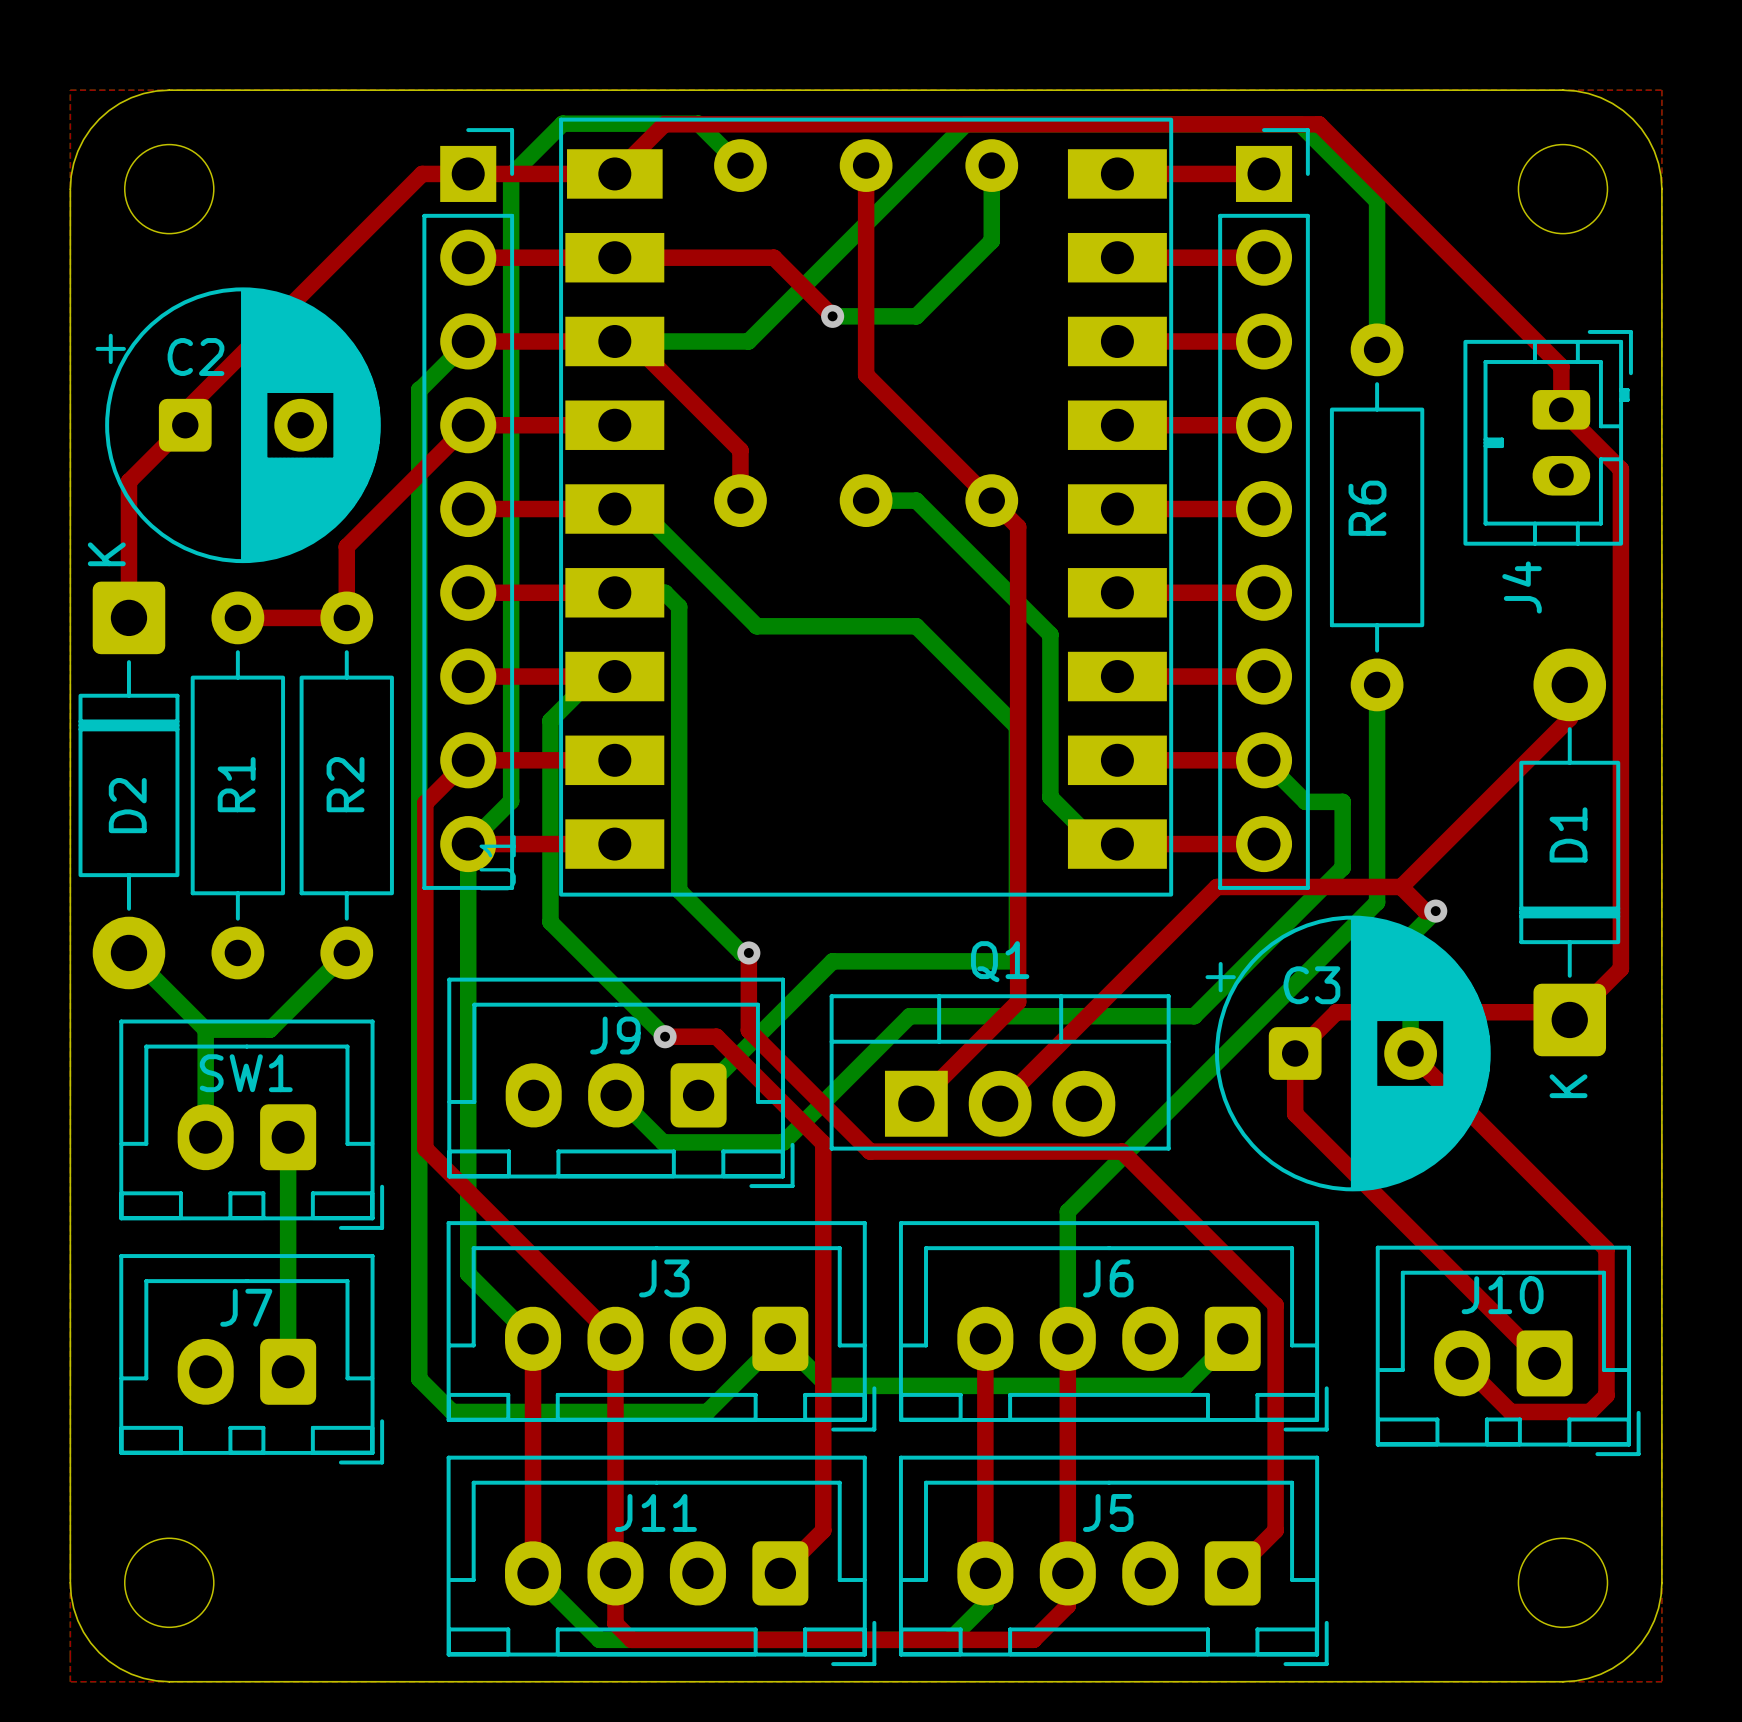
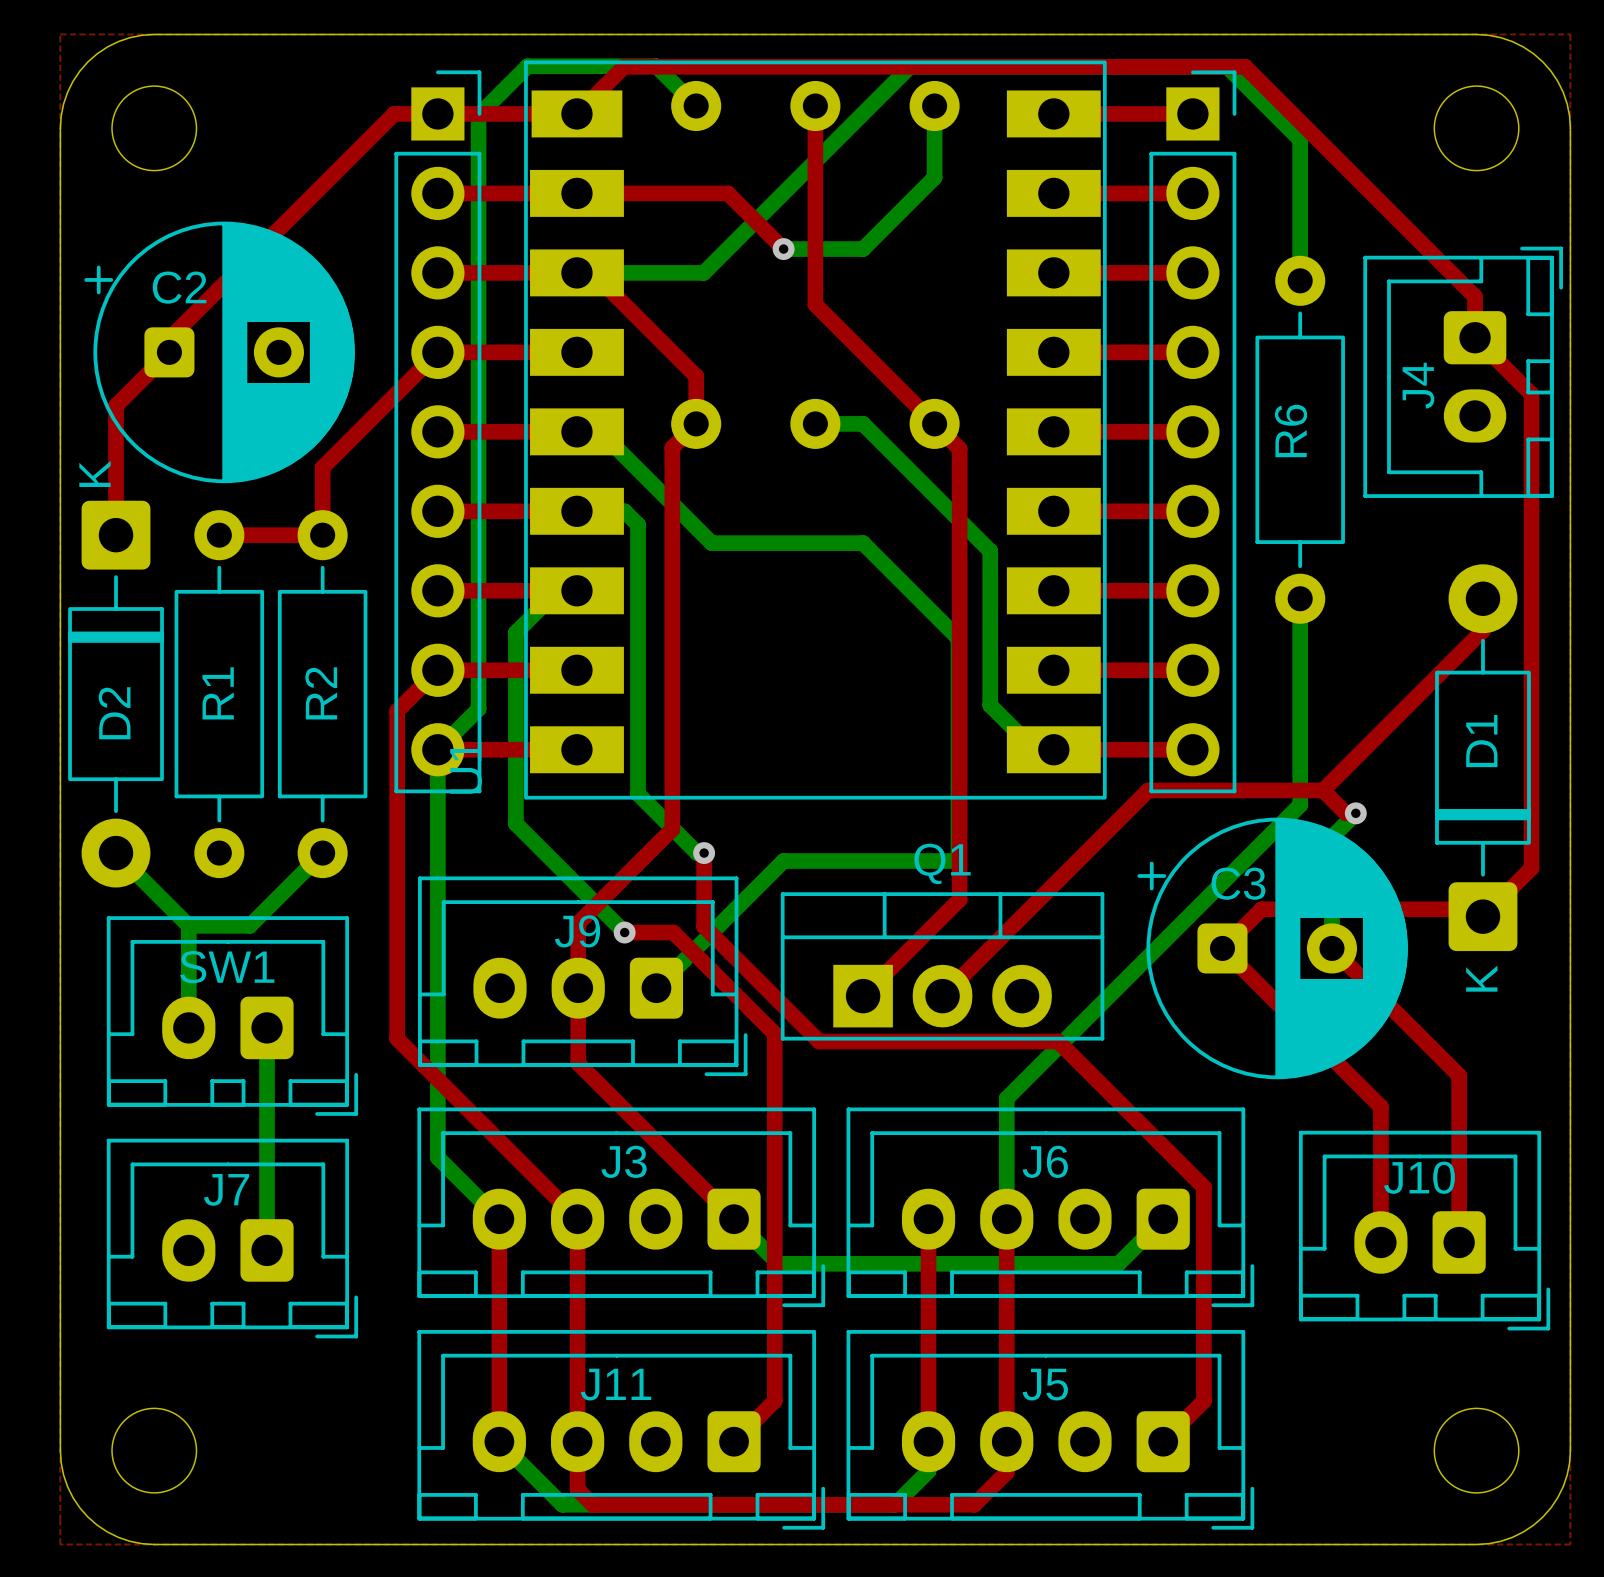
J4 footprint: [1463, 330, 1633, 546] -> [1363, 246, 1563, 498]
bottom track: (468, 341) (419, 389) (419, 1378) (452, 1411) (707, 1411) (780, 1338) -> none
top track: none -> (696, 423) (672, 447) (672, 829) (578, 923) (578, 1063) (734, 1219)
J4 name position: J4 (1522, 587) -> J4 (1418, 385)
bottom track: (1264, 760) (1305, 801) (1342, 801) (1342, 867) (1194, 1016) (909, 1016) (783, 1142) (663, 1142) (616, 1095) -> none
top track: (1295, 1053) (1295, 1113) (1544, 1363) -> (1222, 948) (1380, 1106) (1380, 1242)
top track: (1544, 1187) (1606, 1249) (1606, 1395) (1590, 1411) (1510, 1411) (1462, 1363) -> (1459, 1075) (1459, 1242)

